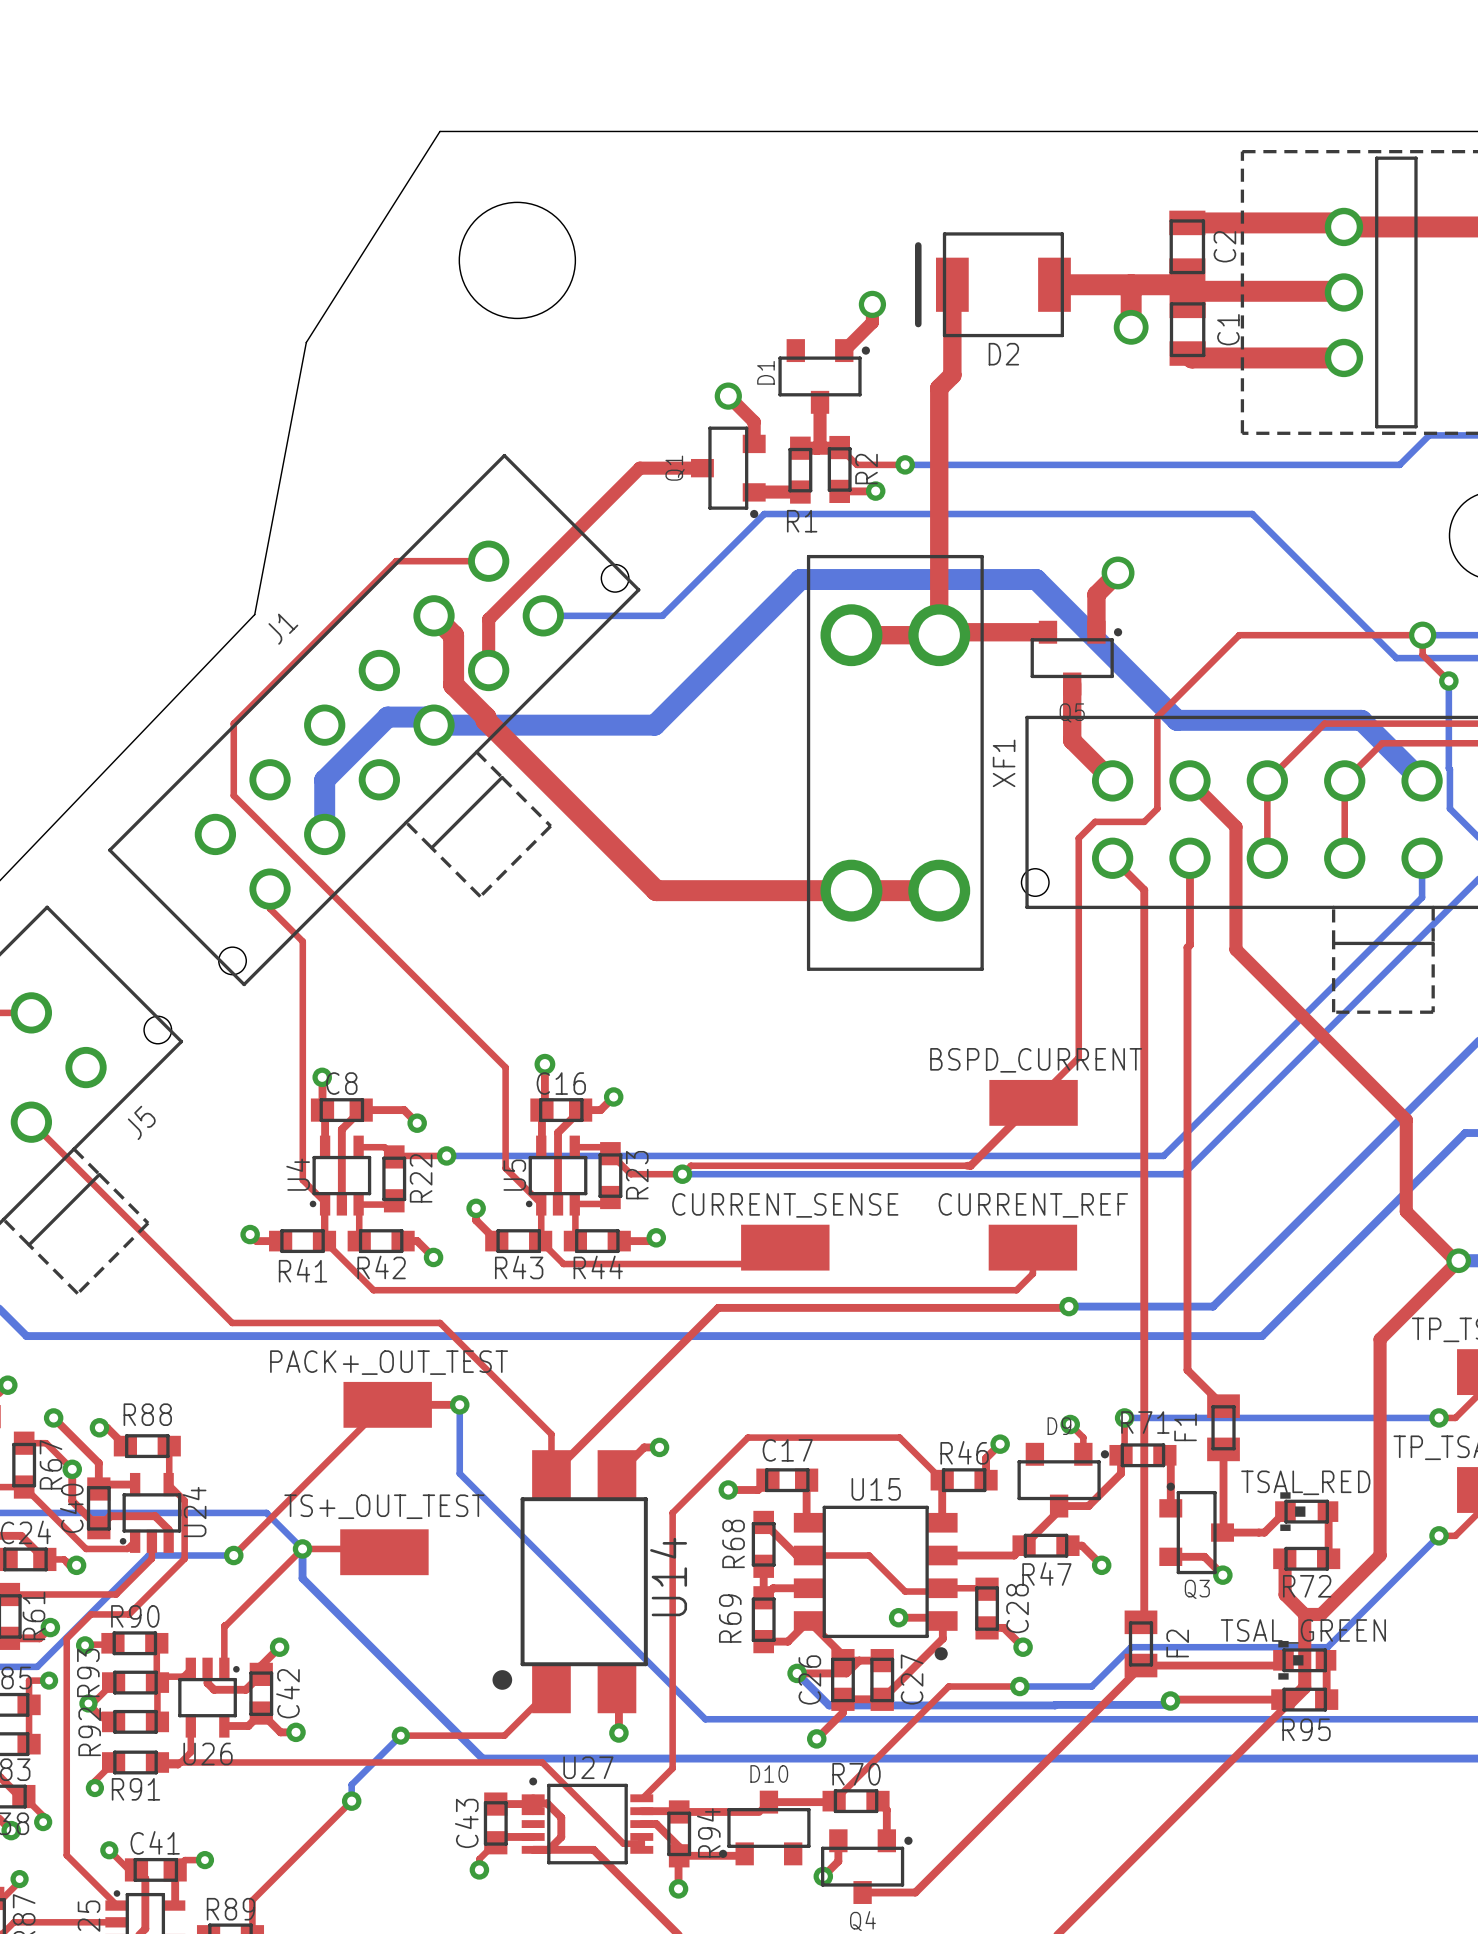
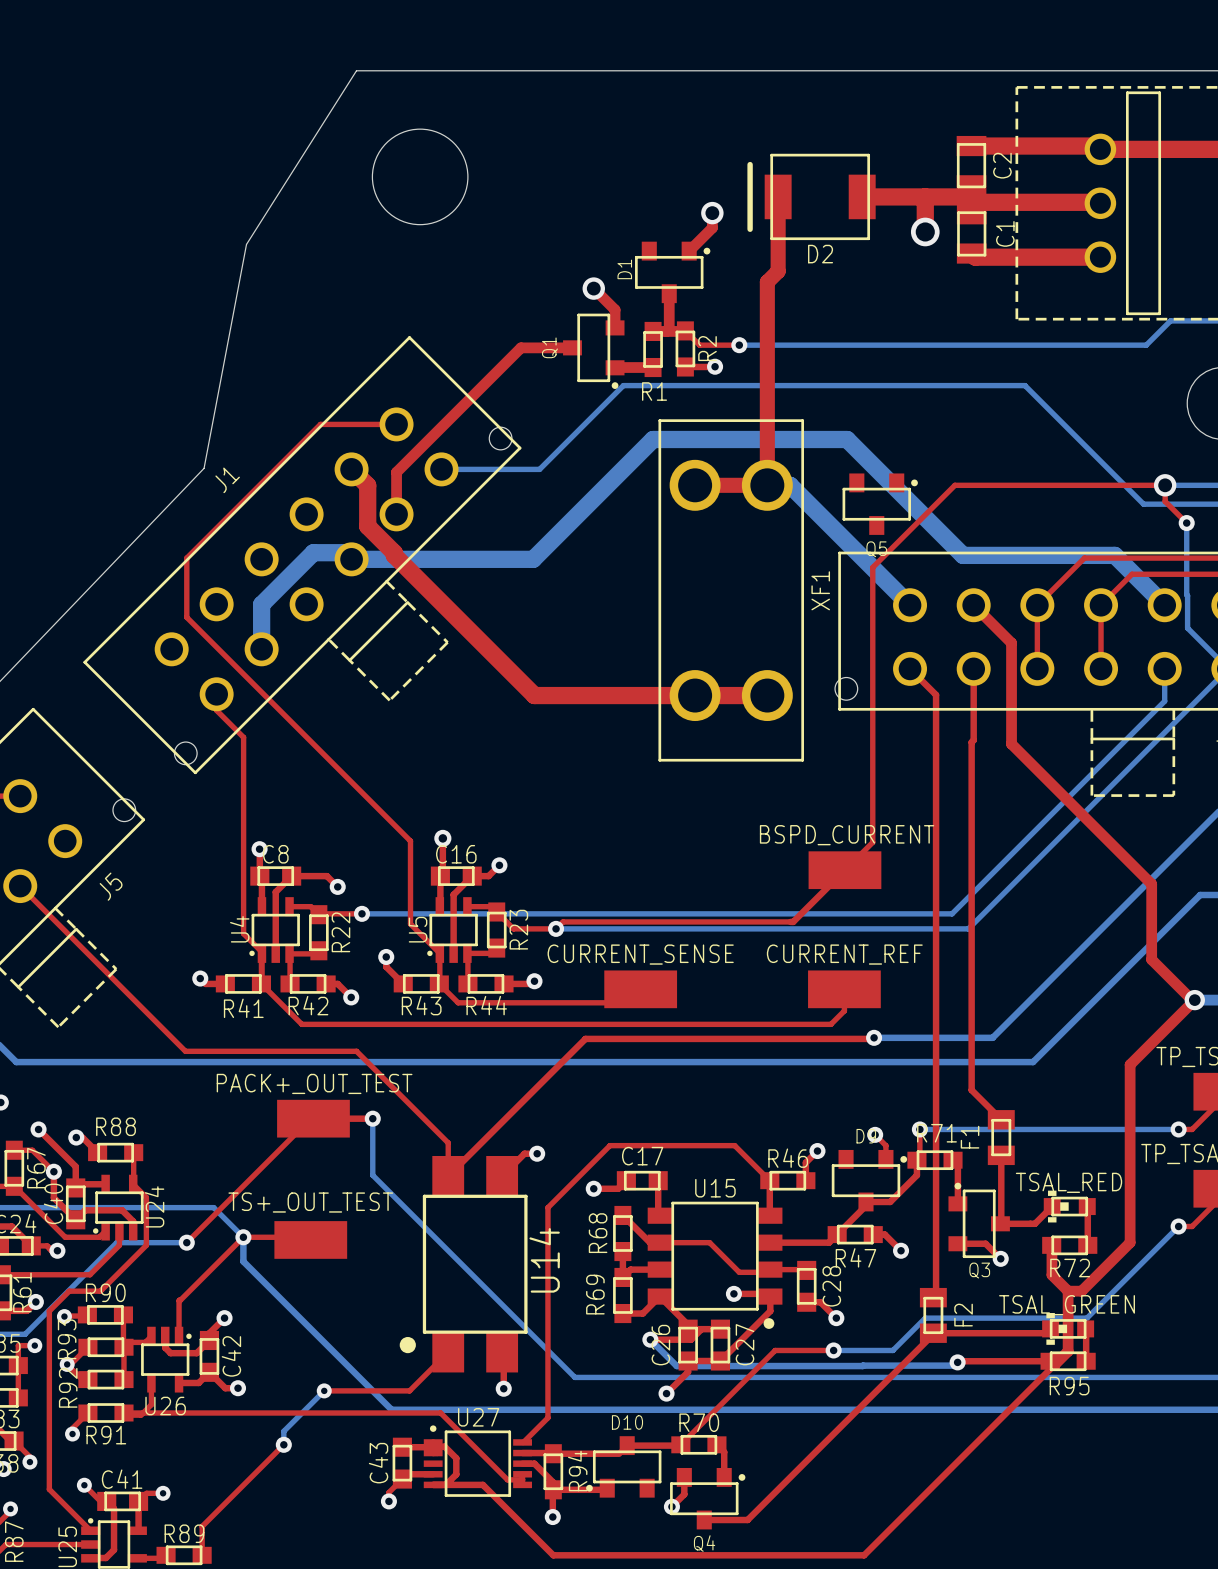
top track: (1118, 572) (1096, 594) (1096, 632) -> none
via: (1118, 572) -> none
top track: (942, 632) (1047, 632) -> none
bottom track: none -> (767, 485) (790, 485) (910, 605)
top track: (1239, 635) (1157, 717) (1157, 808) (1144, 821) (1095, 821) (1078, 838) (1078, 1057) (1067, 1069) -> (1014, 485) (954, 485) (872, 567) (872, 842)
top track: (1072, 683) (1072, 740) (1112, 780) -> none

